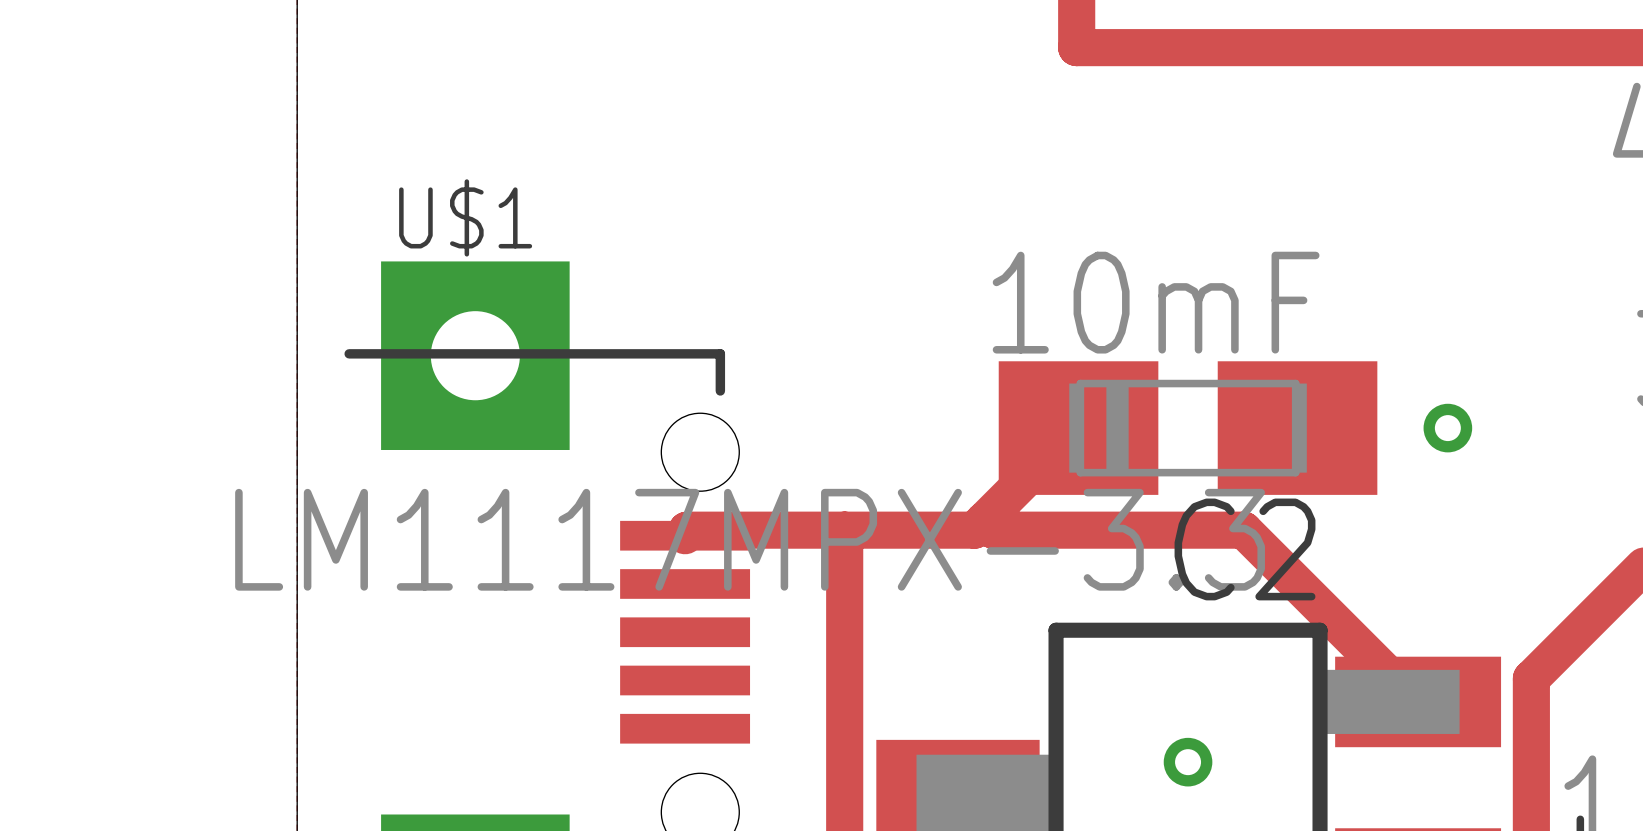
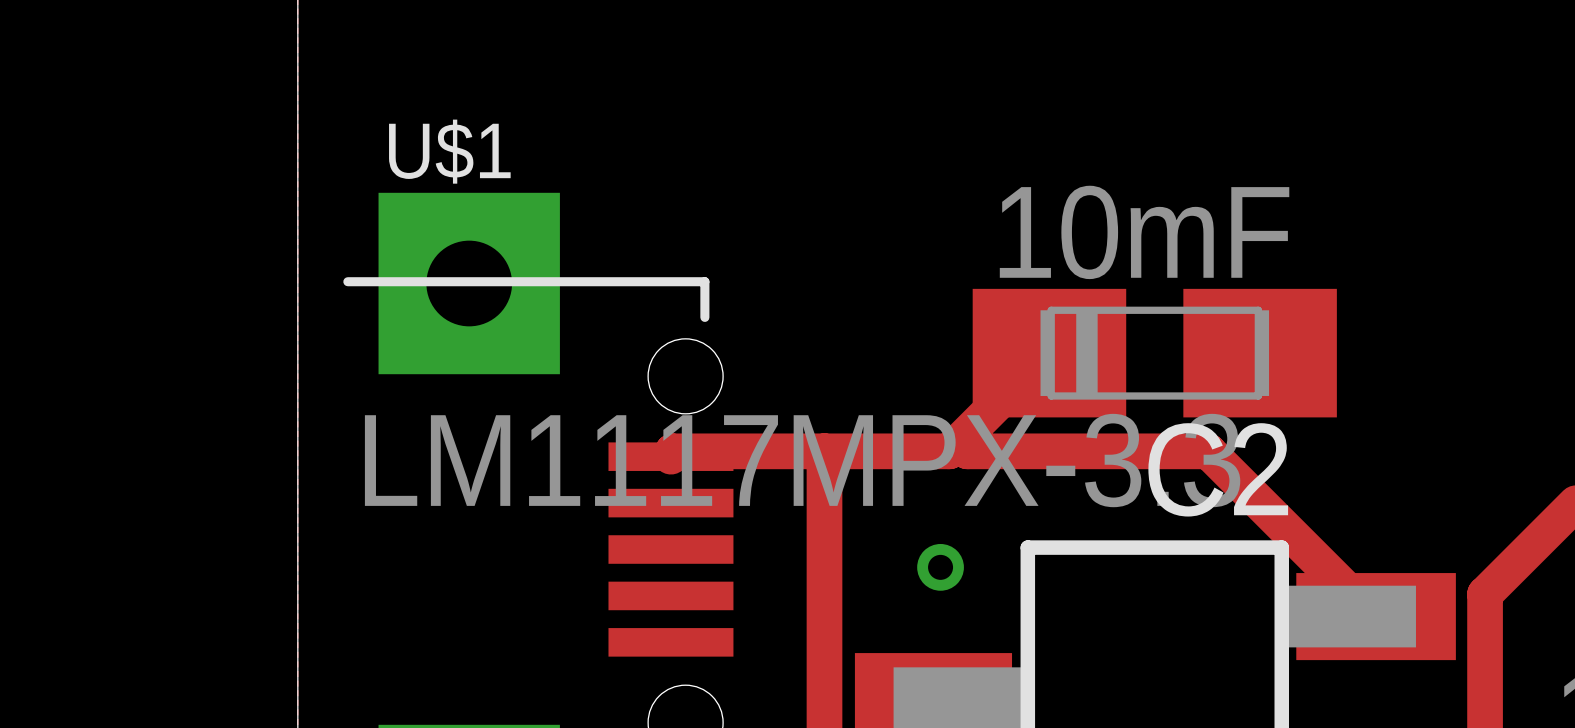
via: (1447, 428) -> none
via position: (1188, 762) -> (940, 567)

